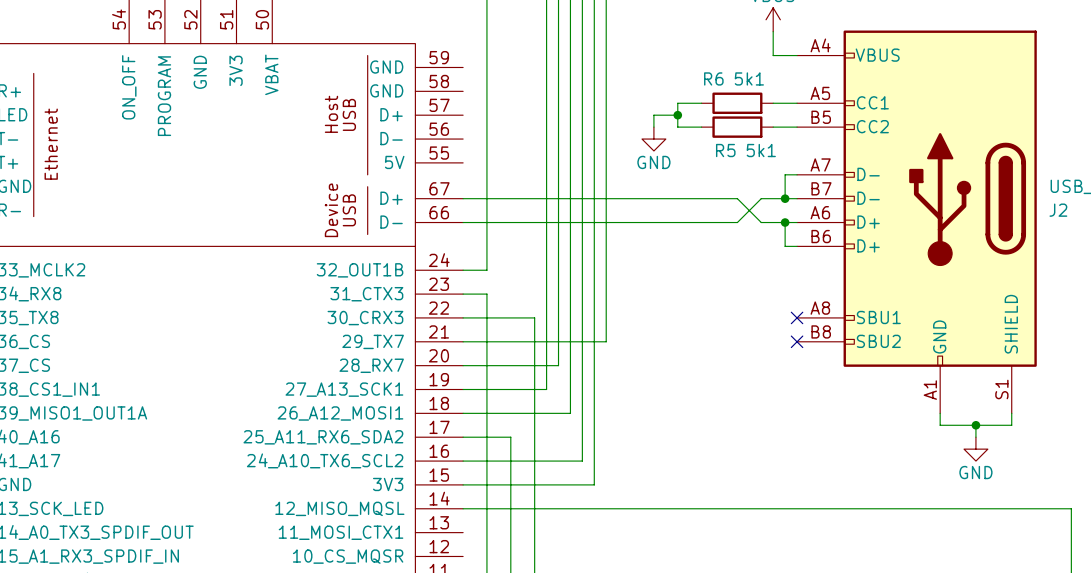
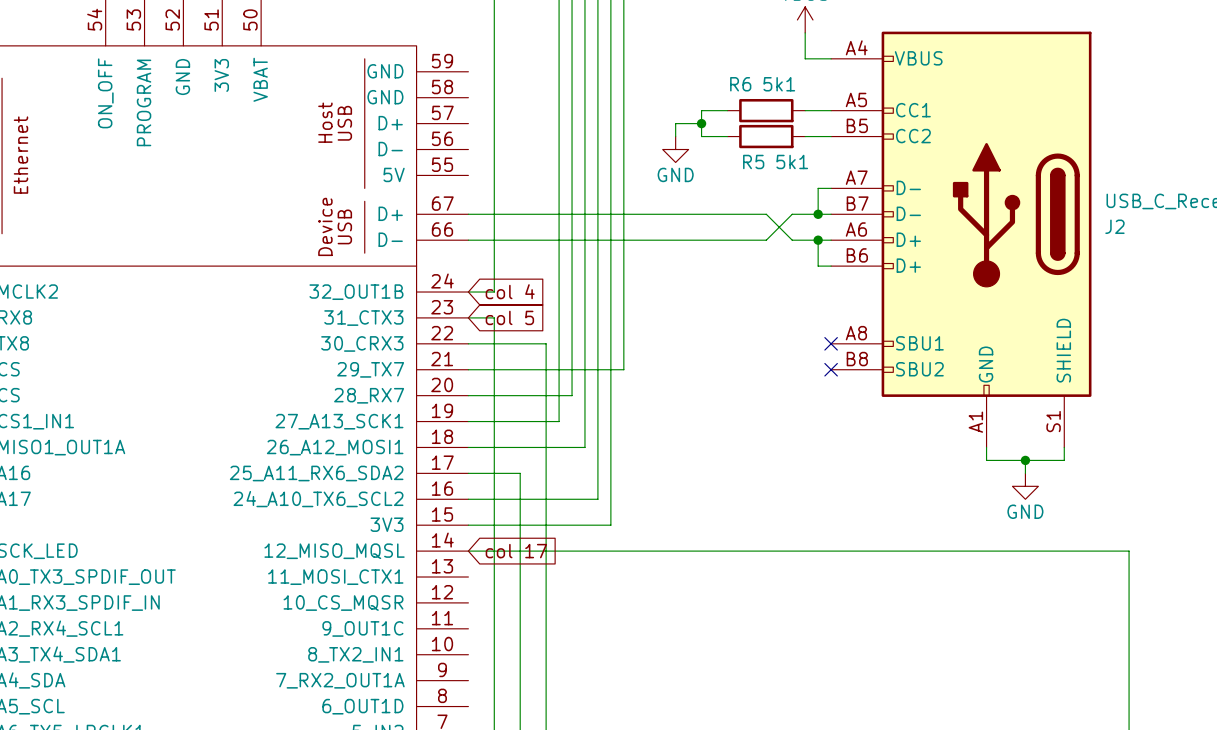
global label: none -> col 4 (510, 291)
global label: none -> col 5 (509, 317)
global label: none -> col 17 (516, 551)

